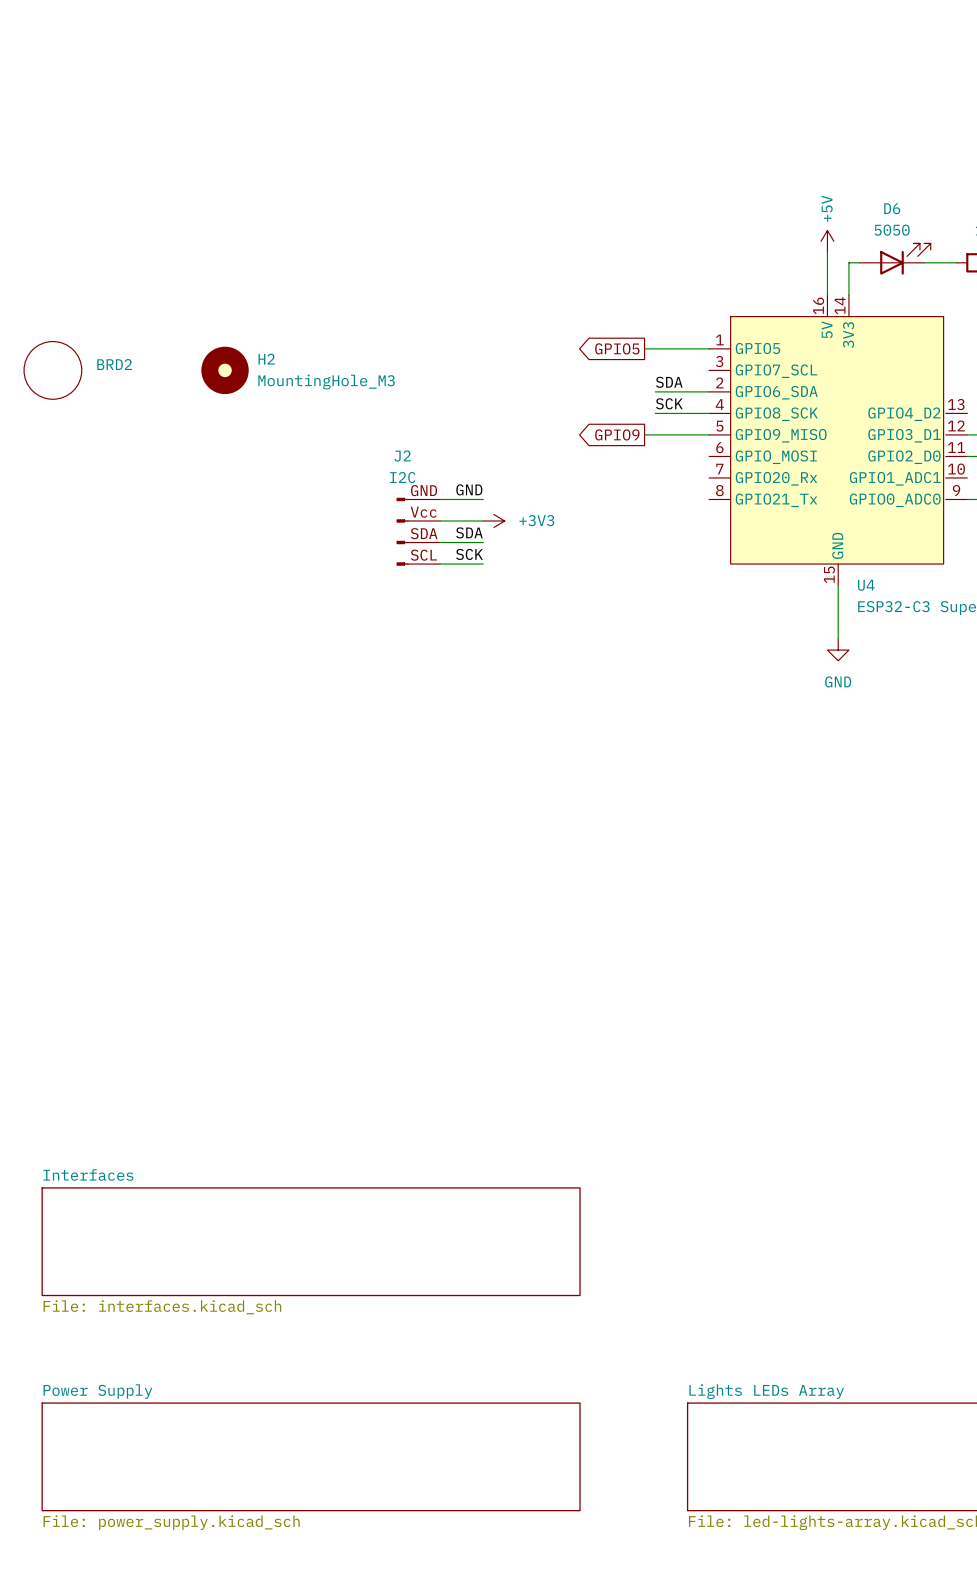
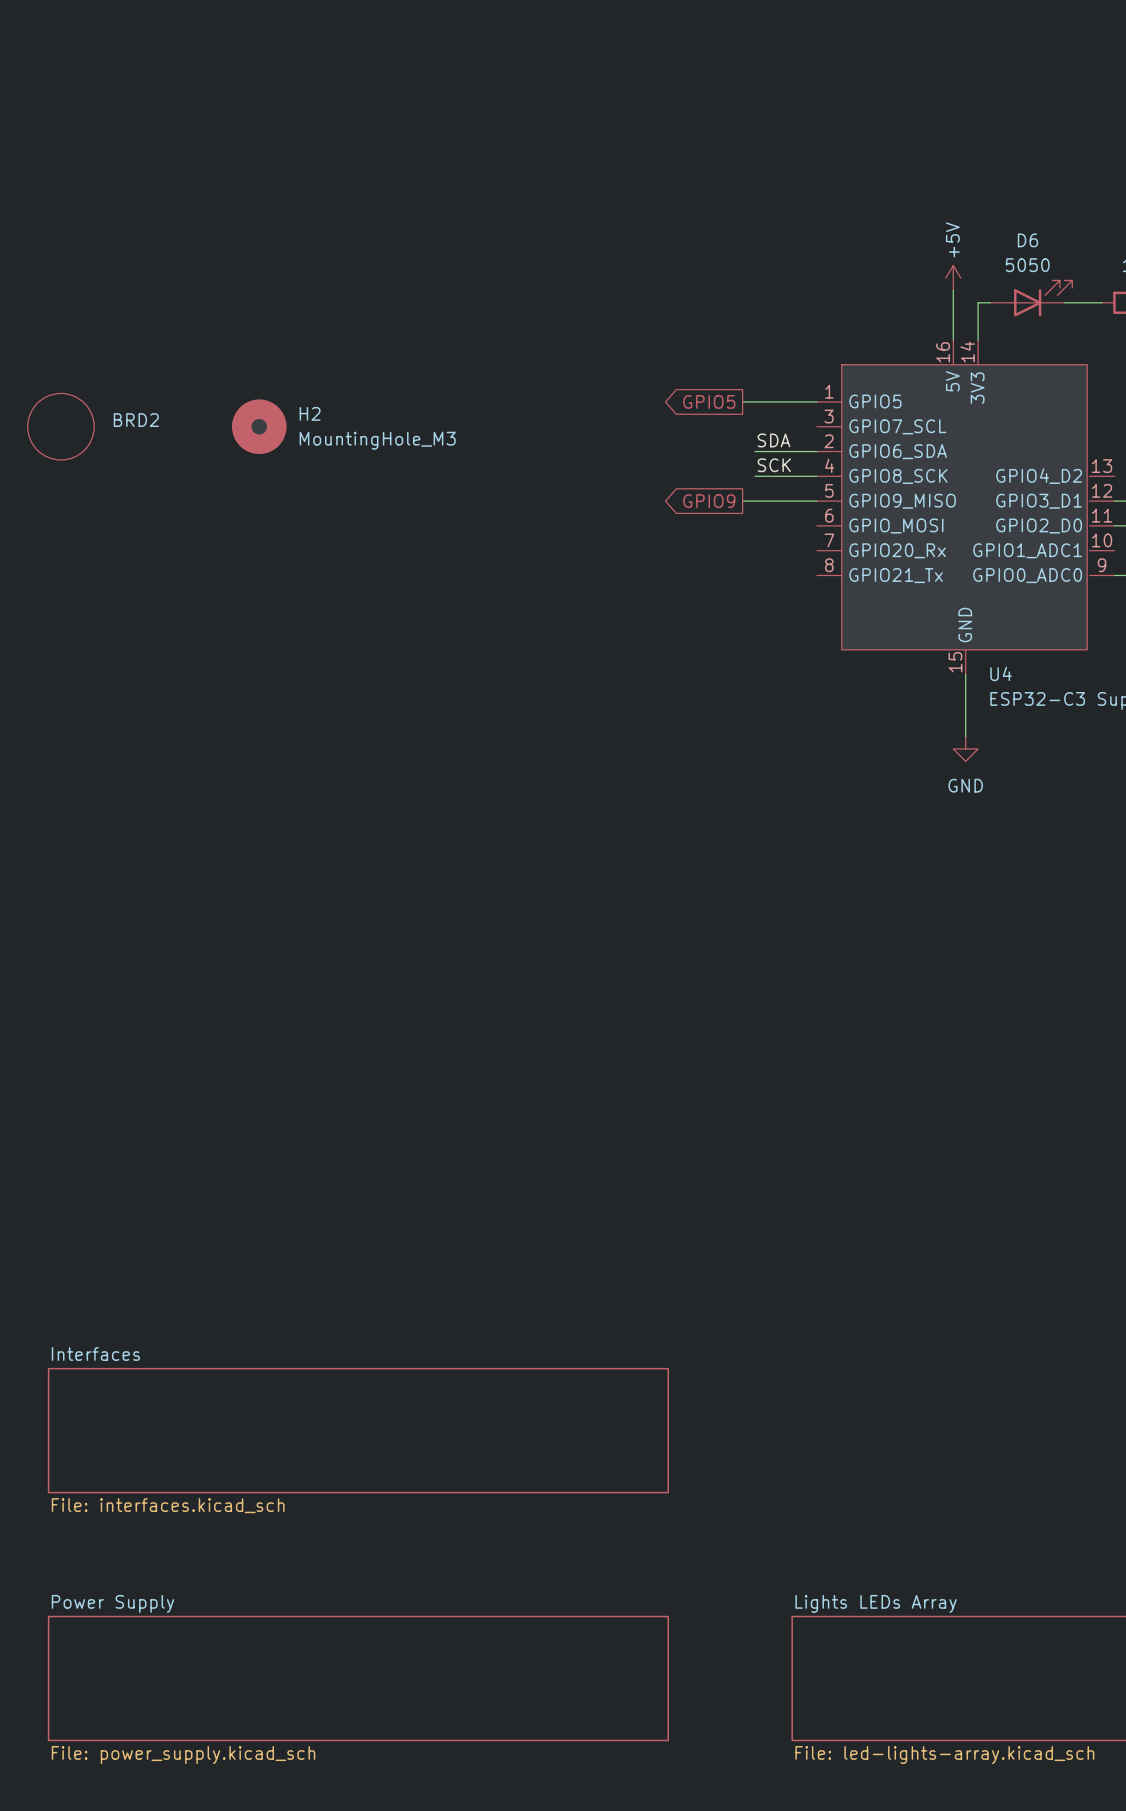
label: GND (469, 489) -> none
wire: (440, 499) (483, 499) -> none
wire: (440, 520) (483, 520) -> none
power symbol: +3V3 (493, 520) -> none
J2: I2C (418, 531) -> none
label: SDA (469, 532) -> none
wire: (440, 542) (483, 542) -> none
label: SCK (469, 554) -> none
wire: (440, 564) (483, 564) -> none

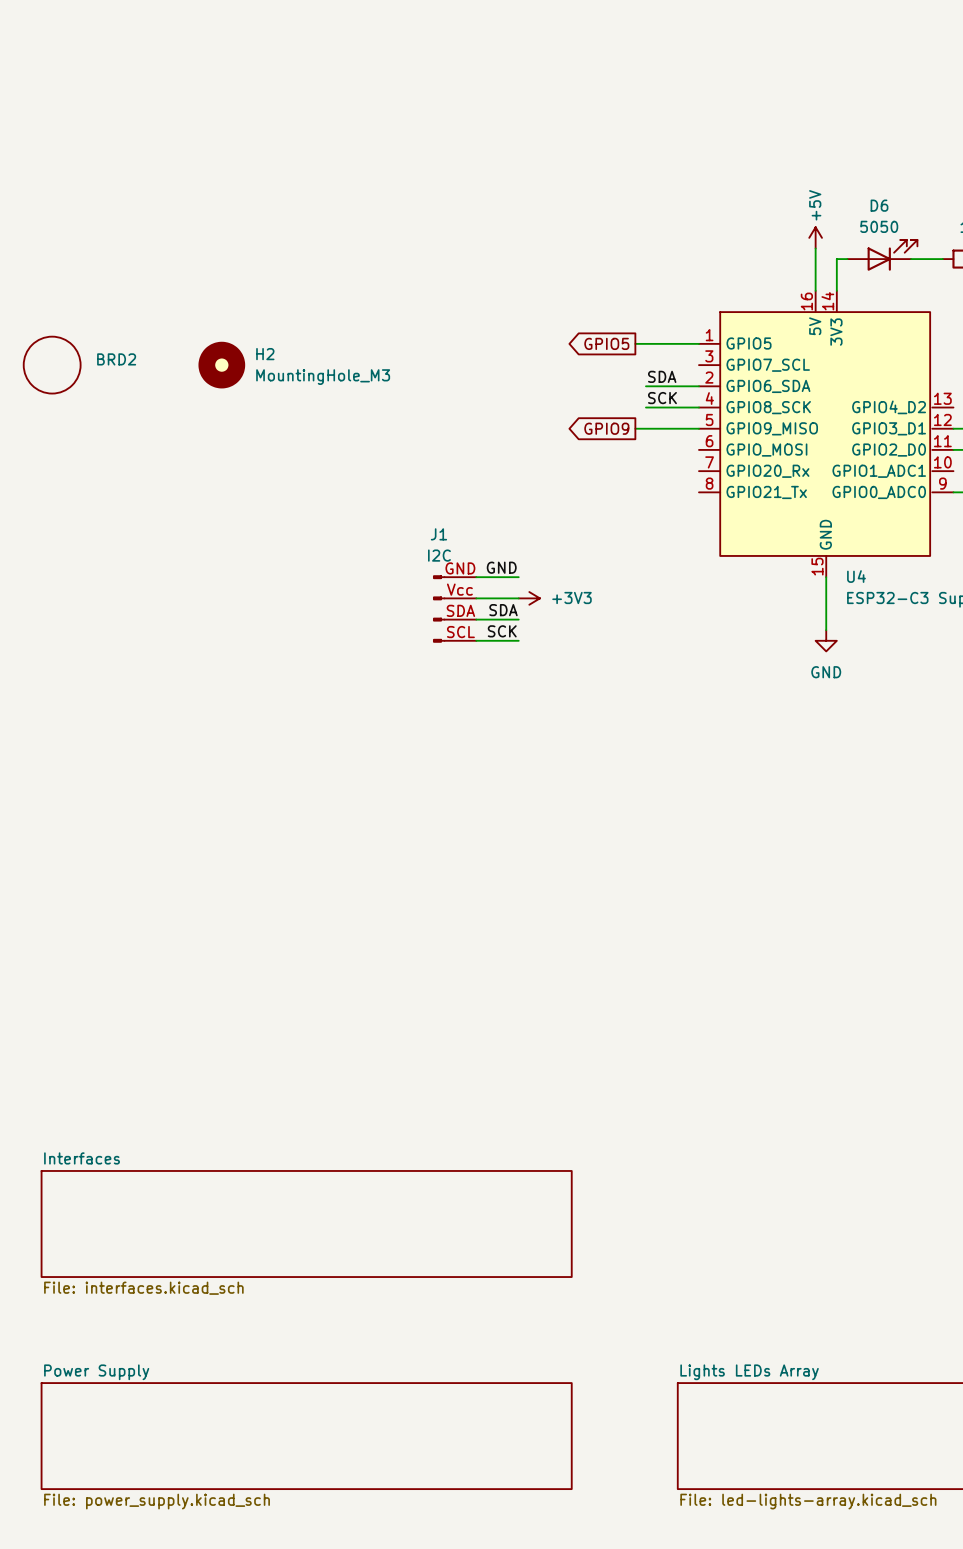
label: none -> GND (501, 567)
wire: none -> (476, 577) (518, 577)
wire: none -> (476, 598) (518, 598)
power symbol: none -> +3V3 (529, 598)
J1: none -> I2C (454, 608)
label: none -> SDA (503, 610)
wire: none -> (476, 619) (518, 619)
label: none -> SCK (502, 631)
wire: none -> (476, 640) (518, 640)

